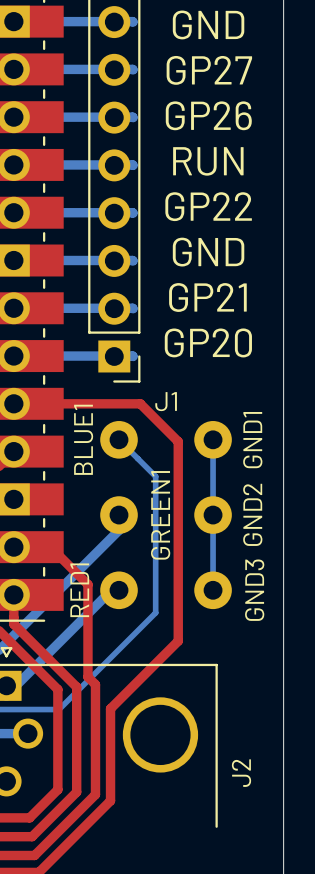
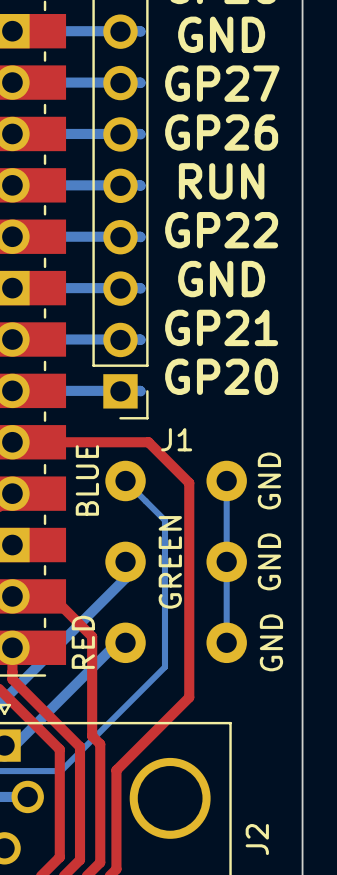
BLUE1 name: BLUE1 (83, 439) -> BLUE (87, 480)
GND1 name: GND1 (252, 440) -> GND (269, 480)
GND2 name: GND2 (252, 514) -> GND (269, 561)
GREEN1 name: GREEN1 (160, 515) -> GREEN (170, 562)
RED1 name: RED1 (79, 590) -> RED (83, 642)
GND3 name: GND3 (254, 590) -> GND (271, 642)

